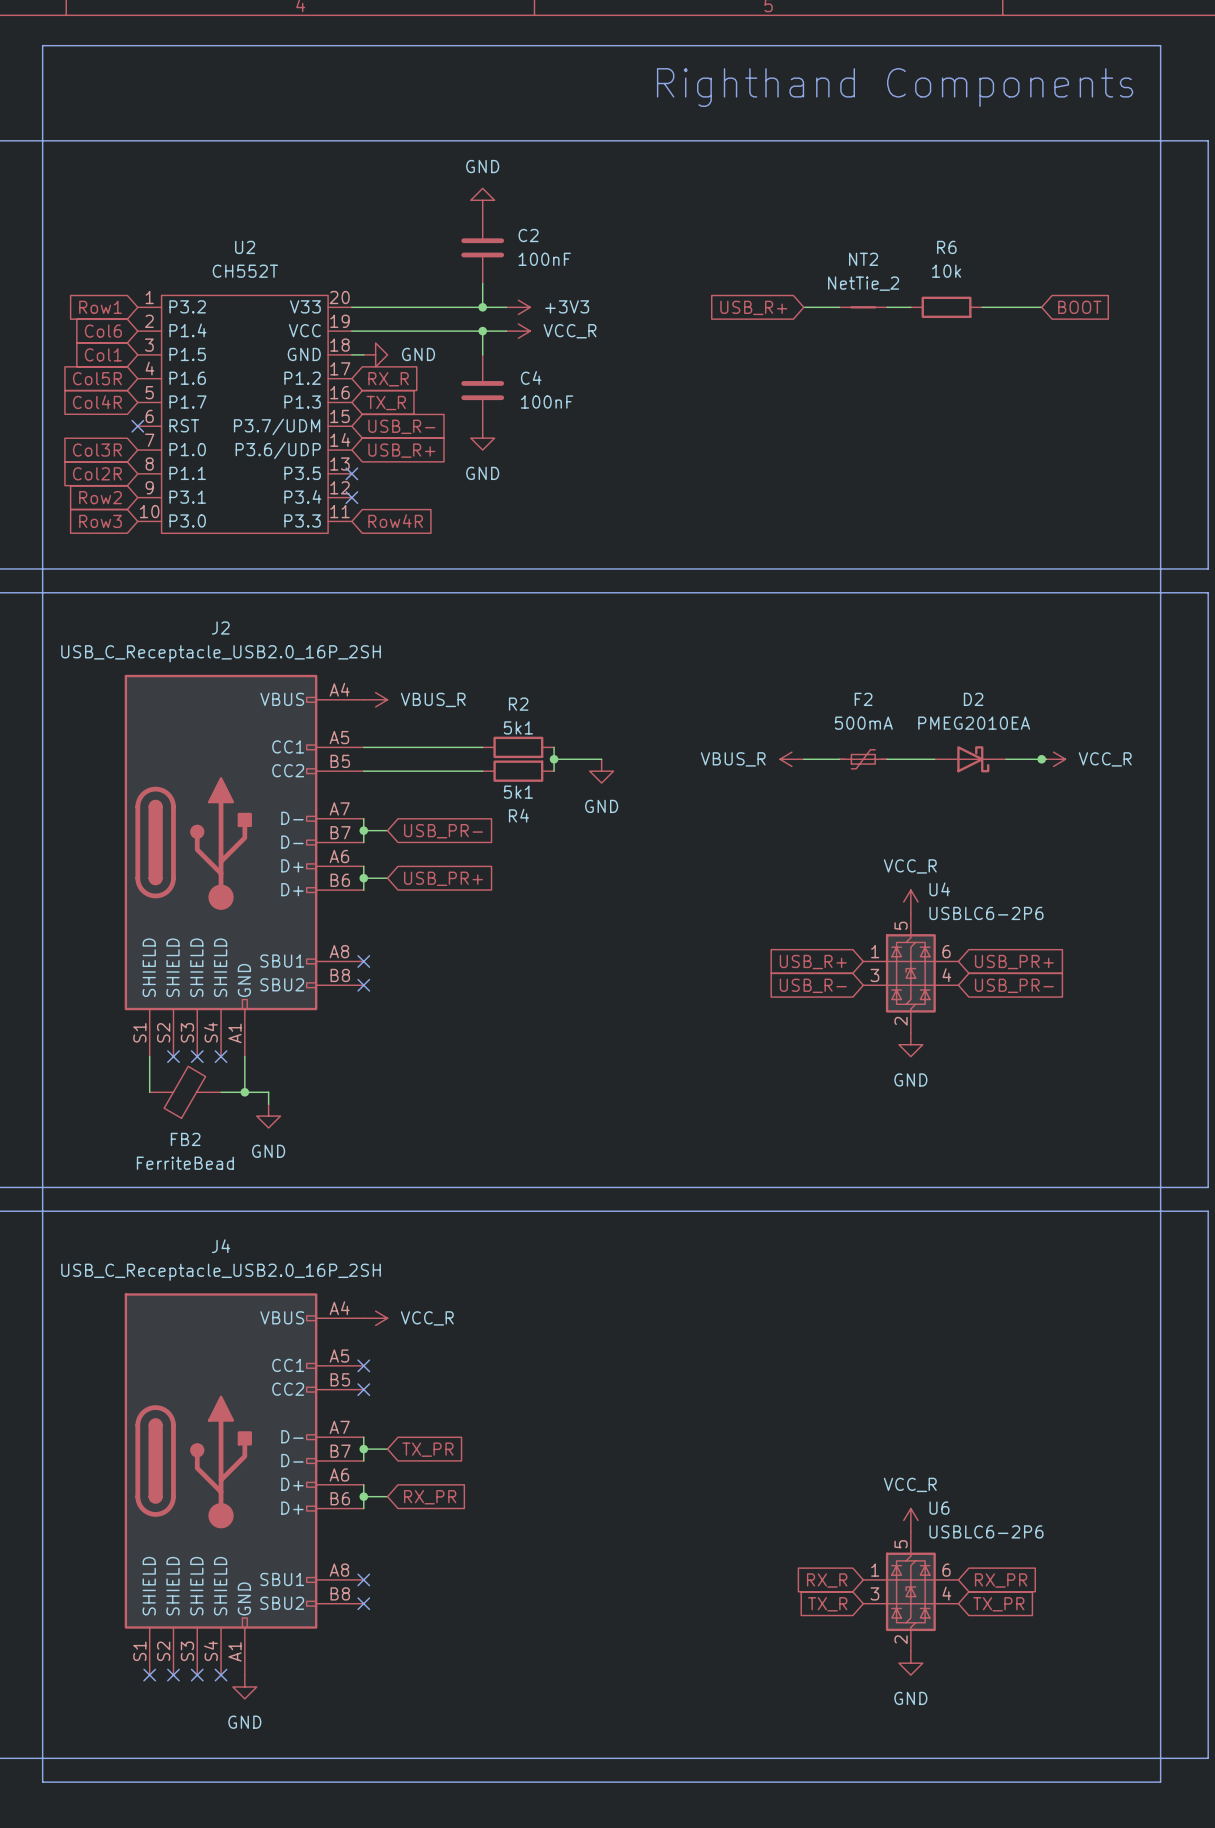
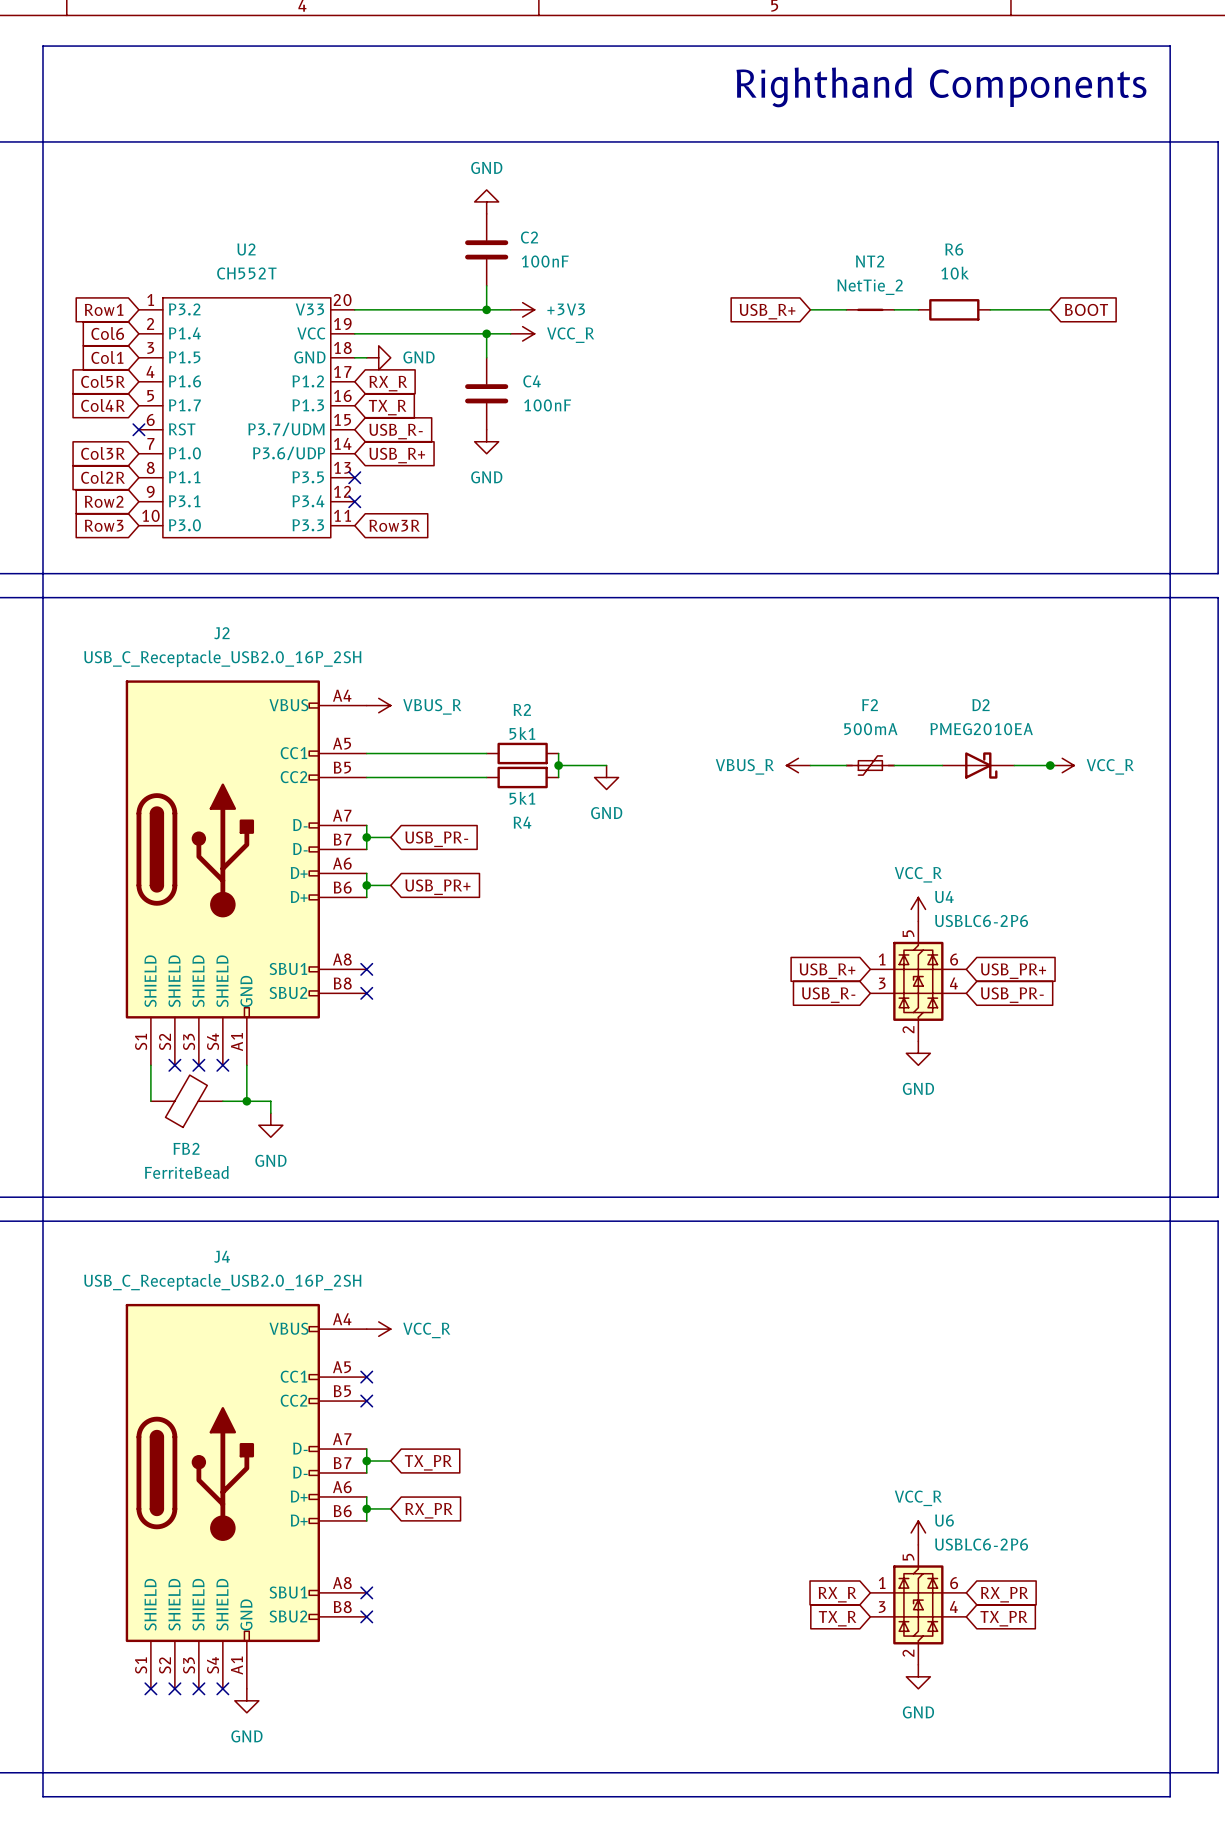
global label: Row4R (395, 521) -> Row3R (394, 525)

